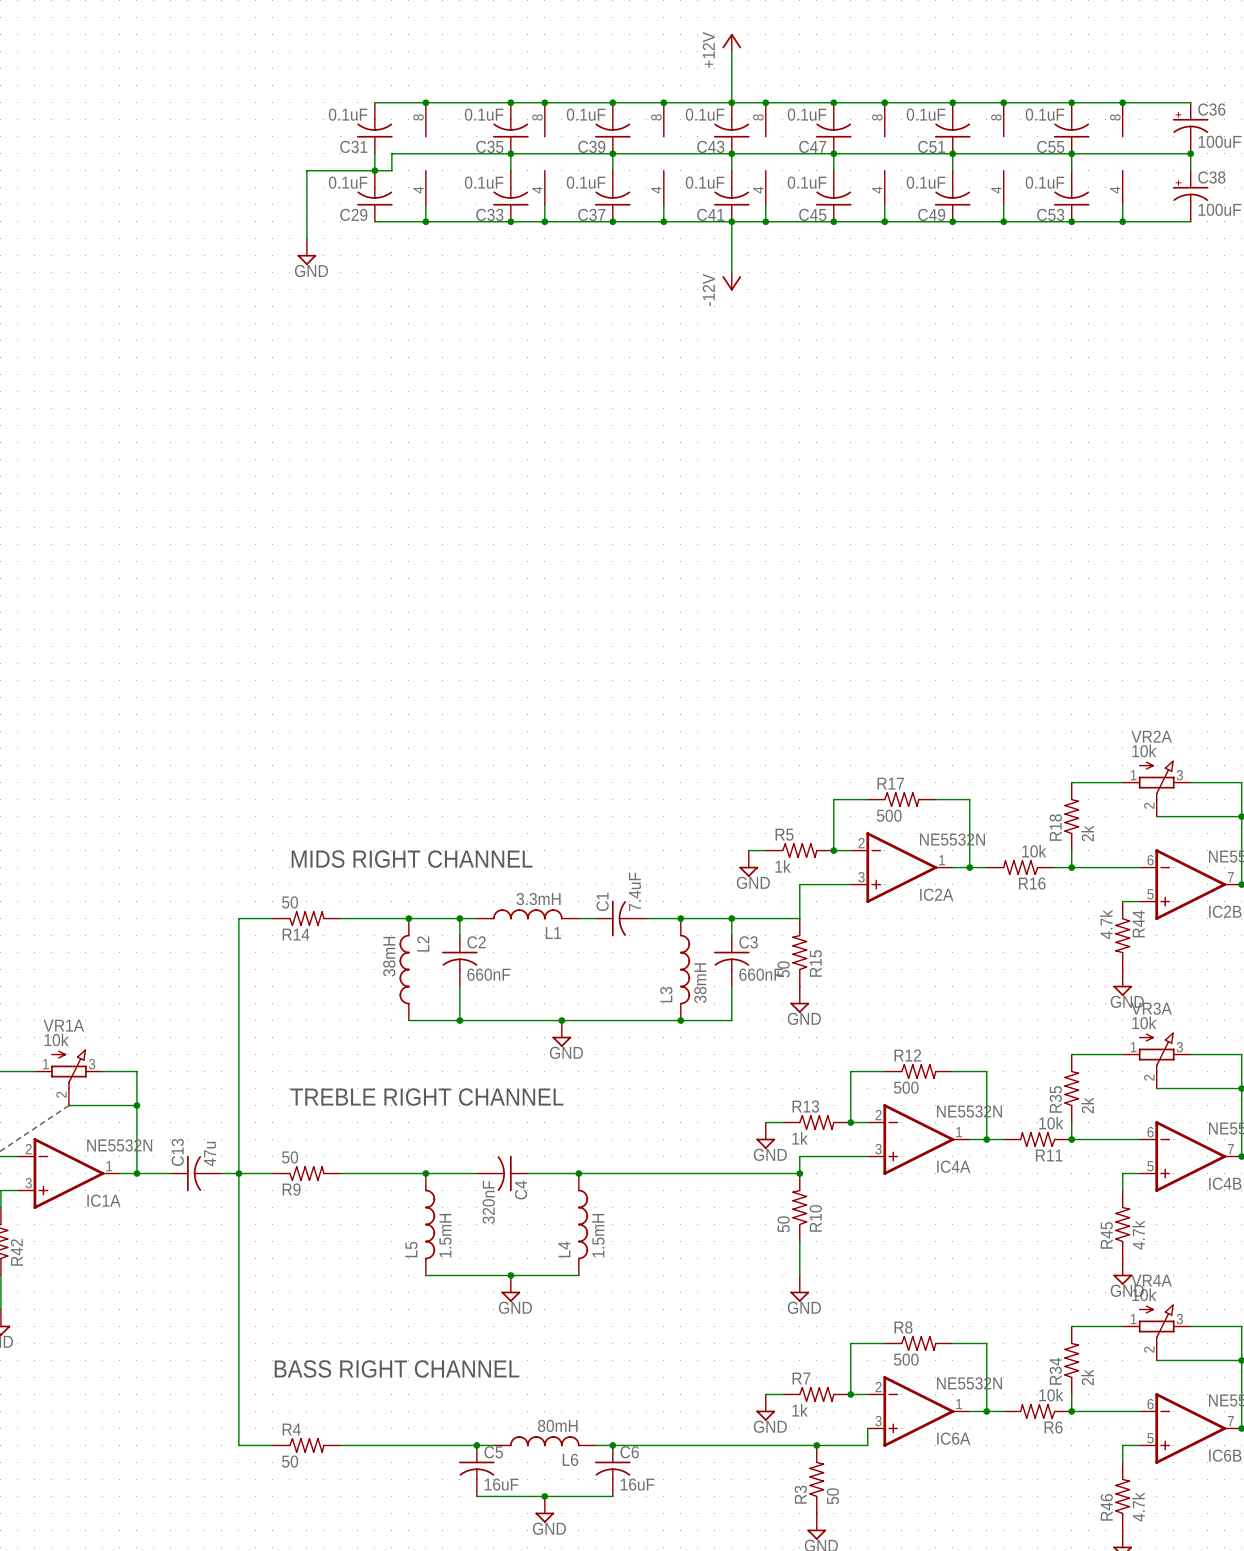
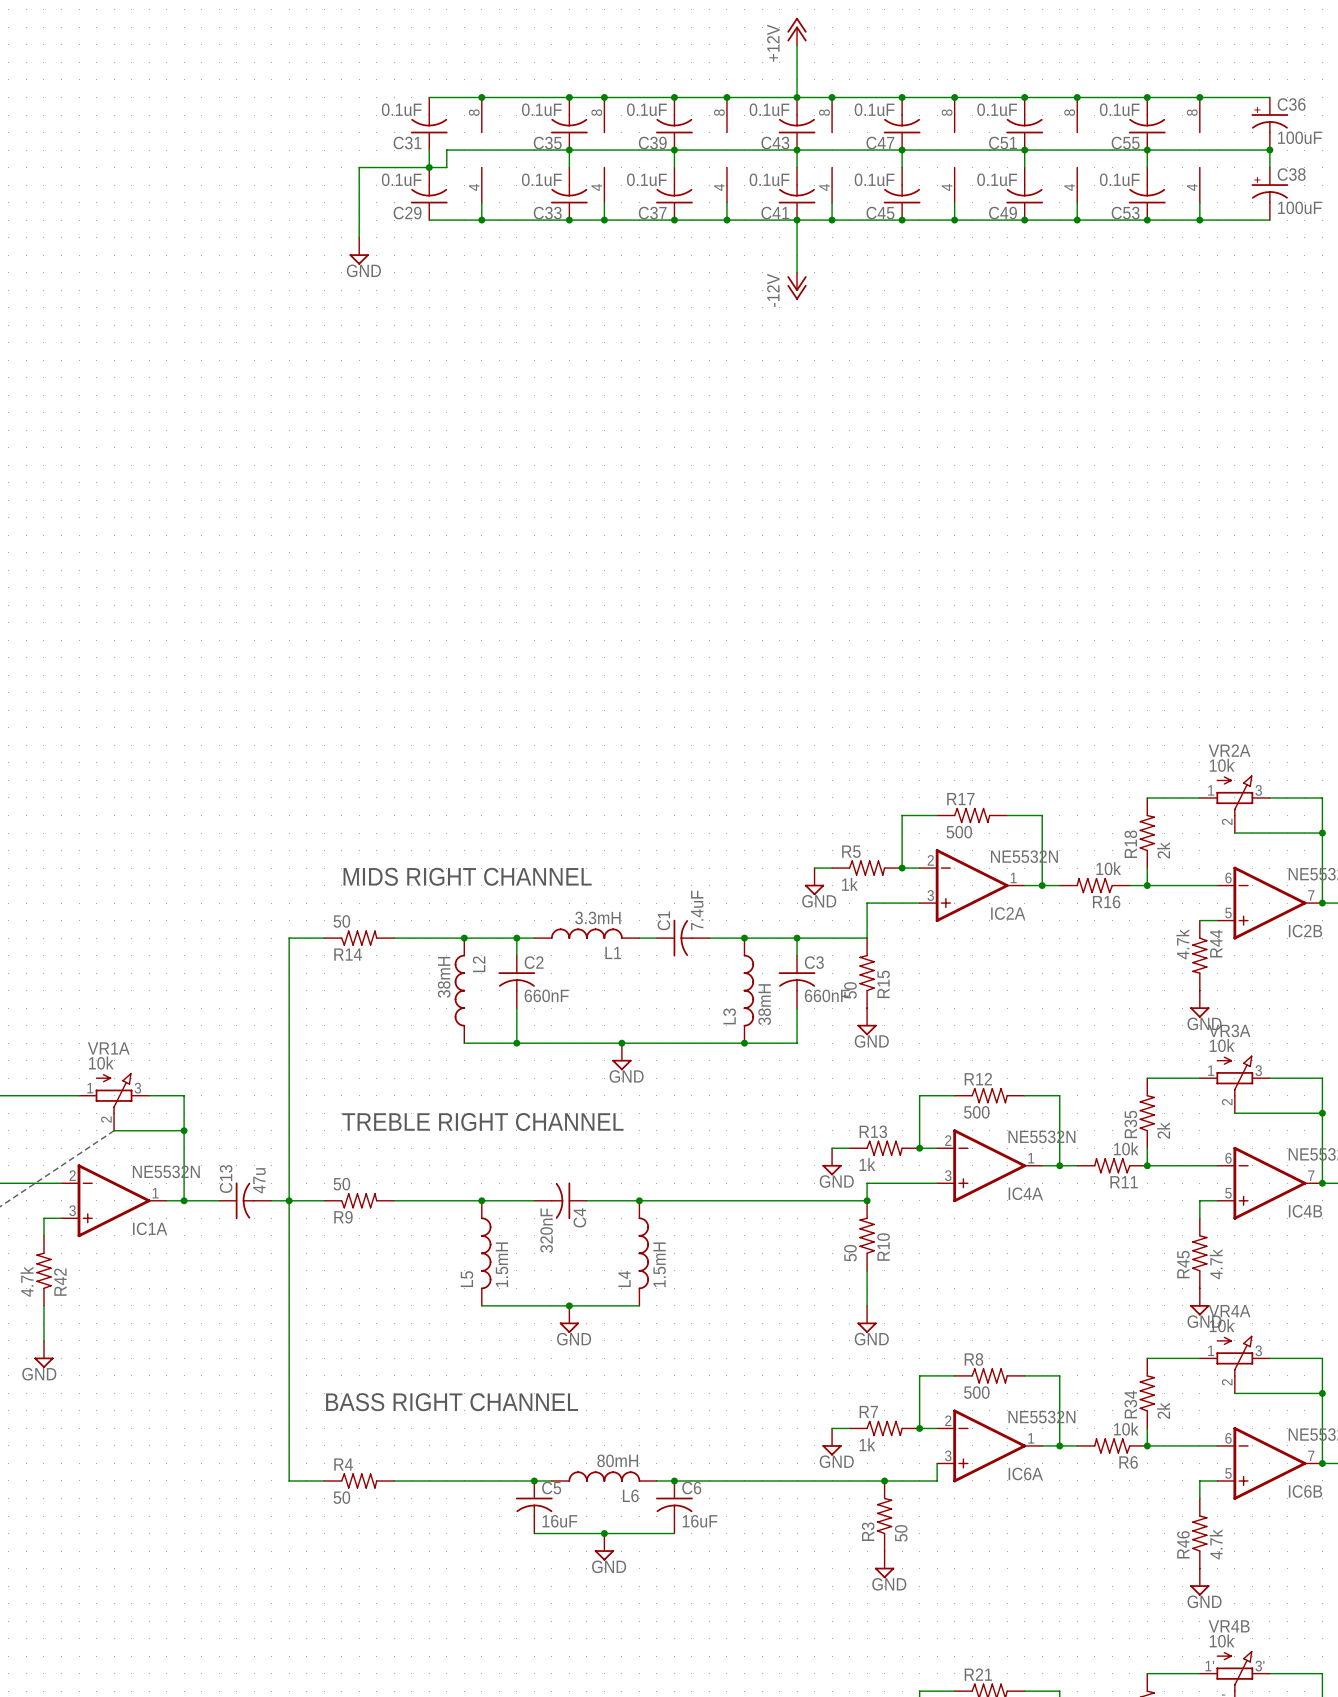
power symbol shape: [722, 33, 742, 52] -> [787, 17, 807, 45]
power symbol shape: [722, 272, 742, 291] -> [787, 272, 807, 300]

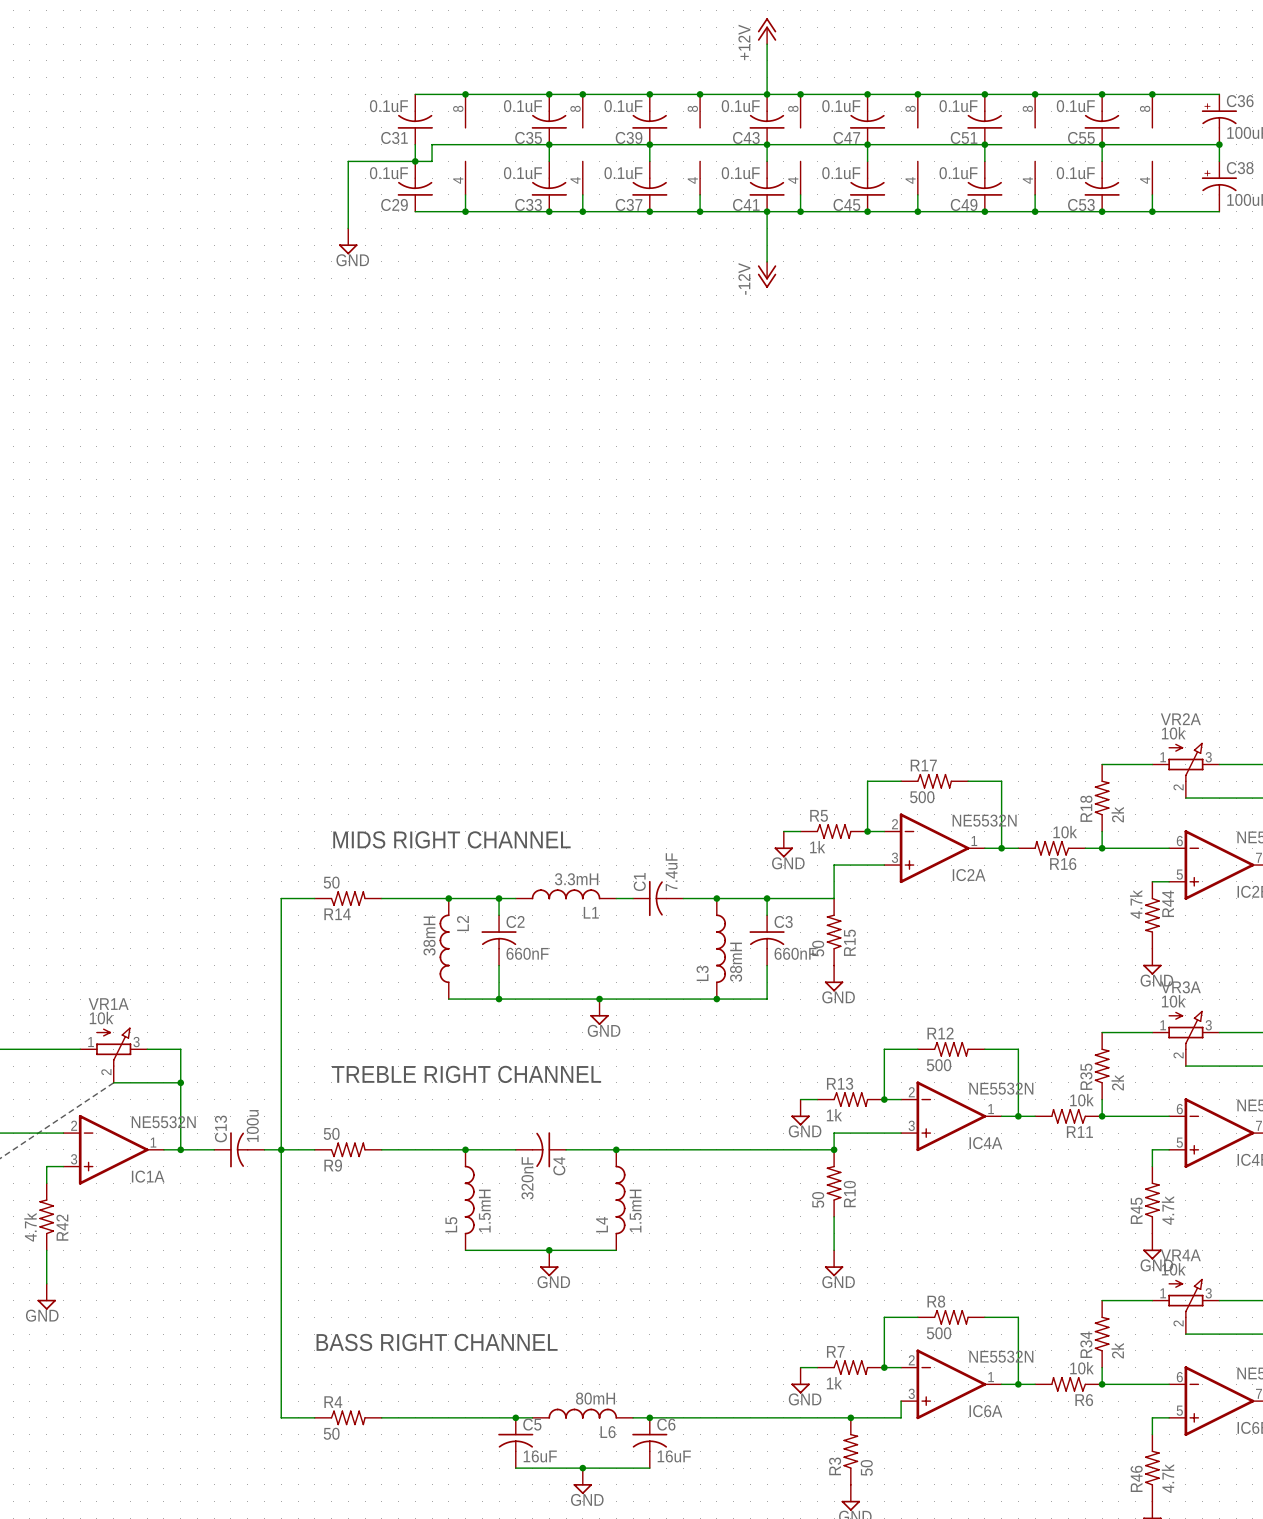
C13 value: 47u (259, 1180) -> 100u (252, 1125)

